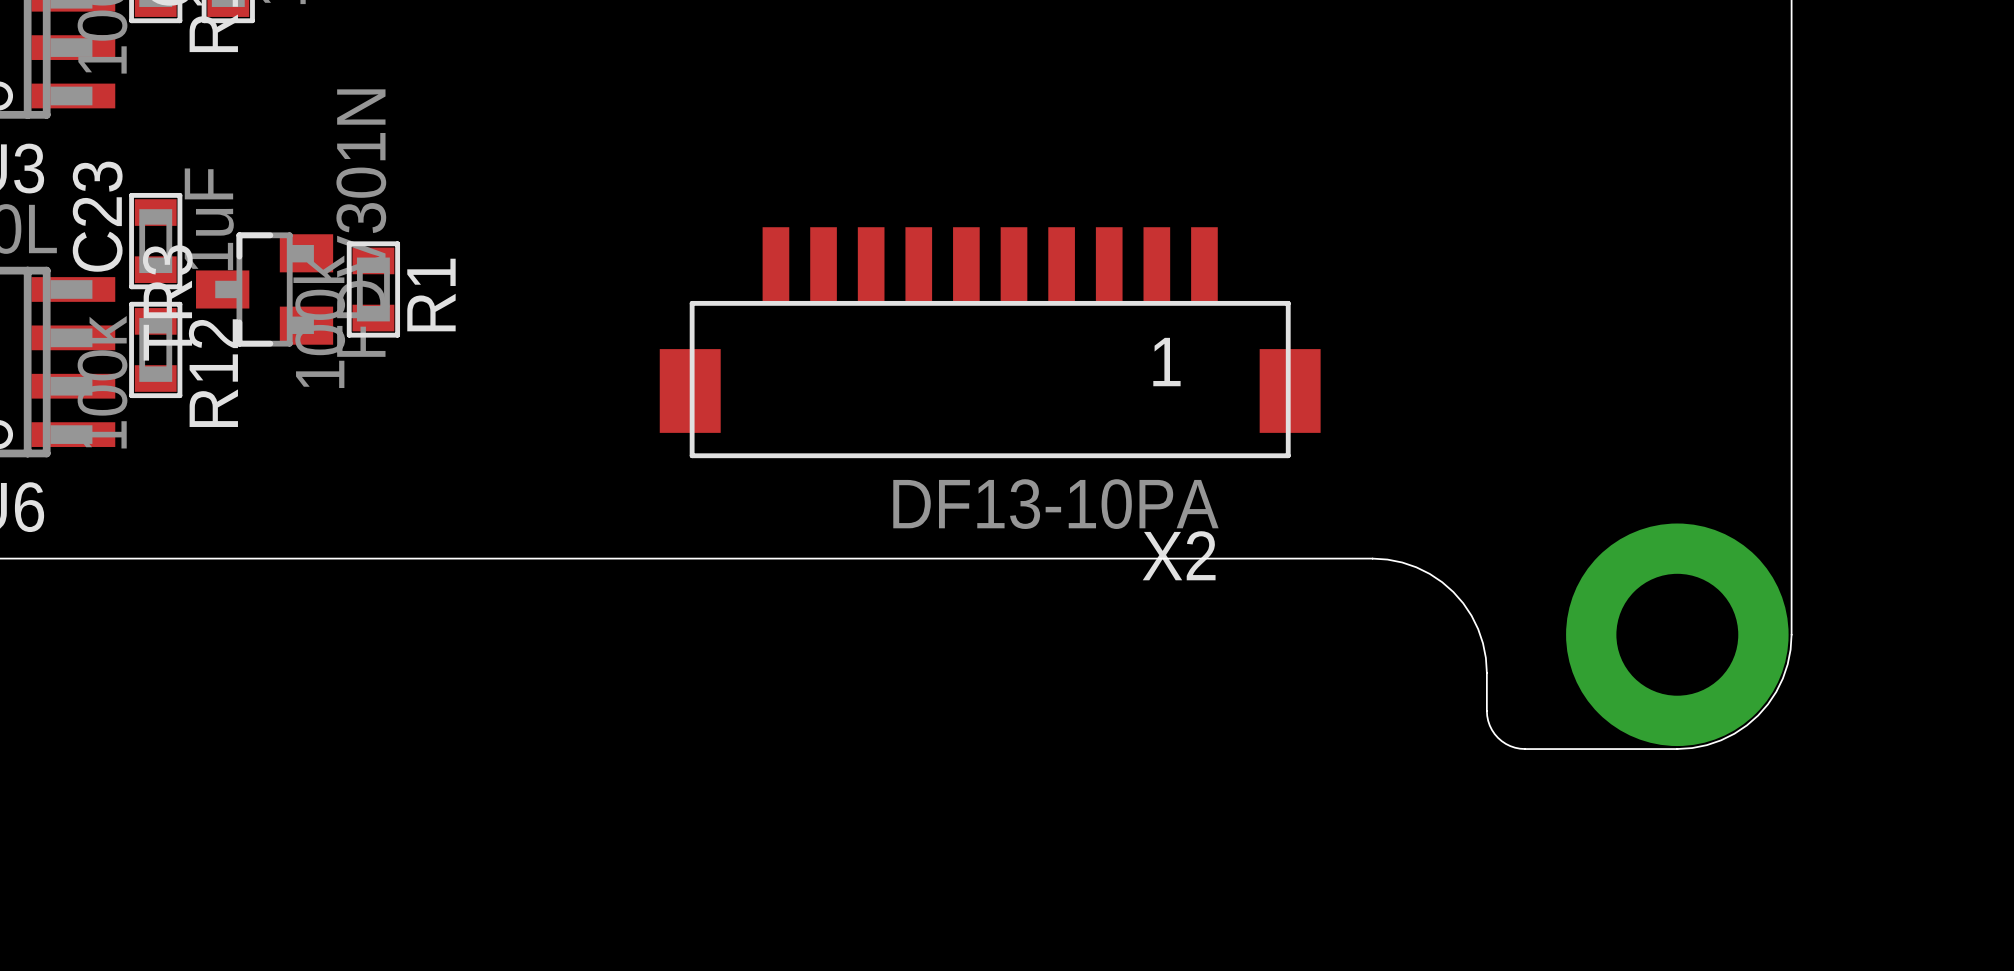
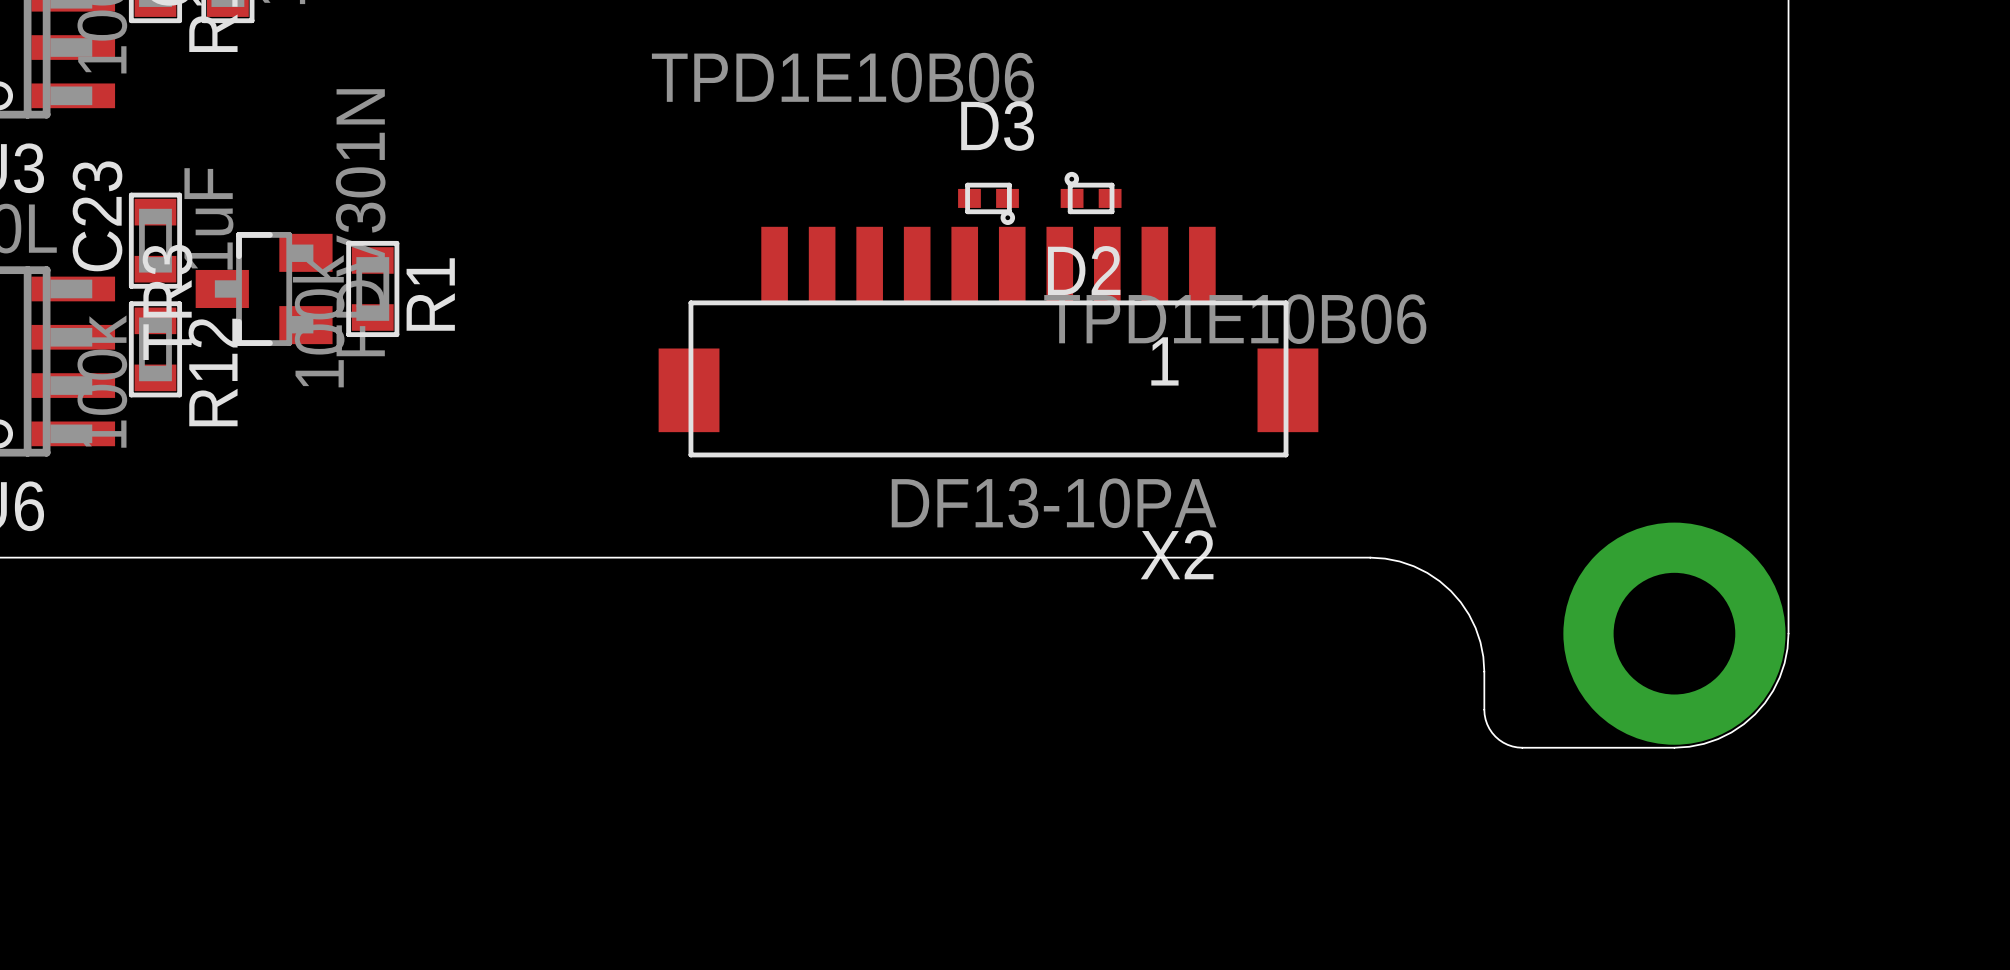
D2: none -> TPD1E10B06 (1091, 193)
D3: none -> TPD1E10B06 (988, 203)

